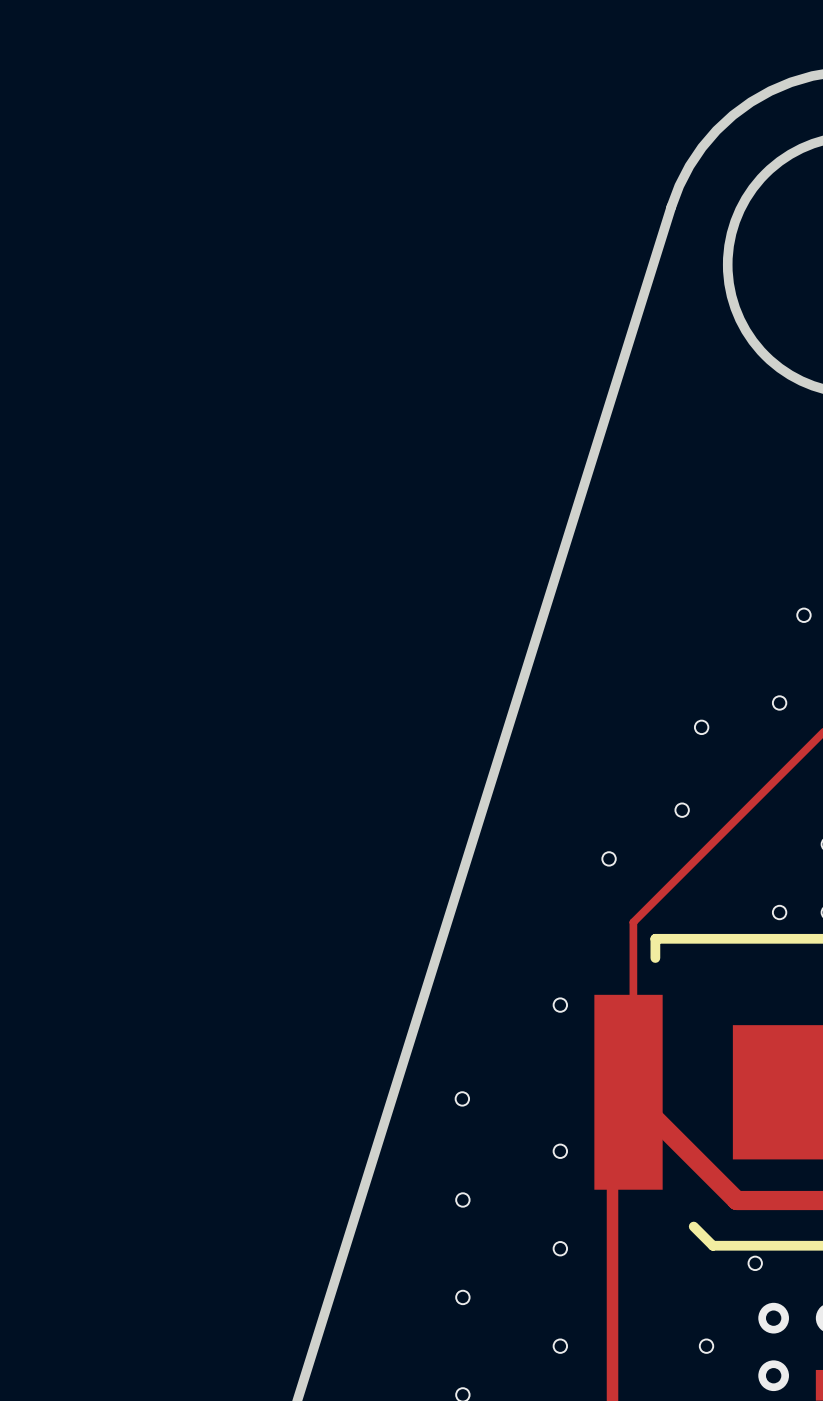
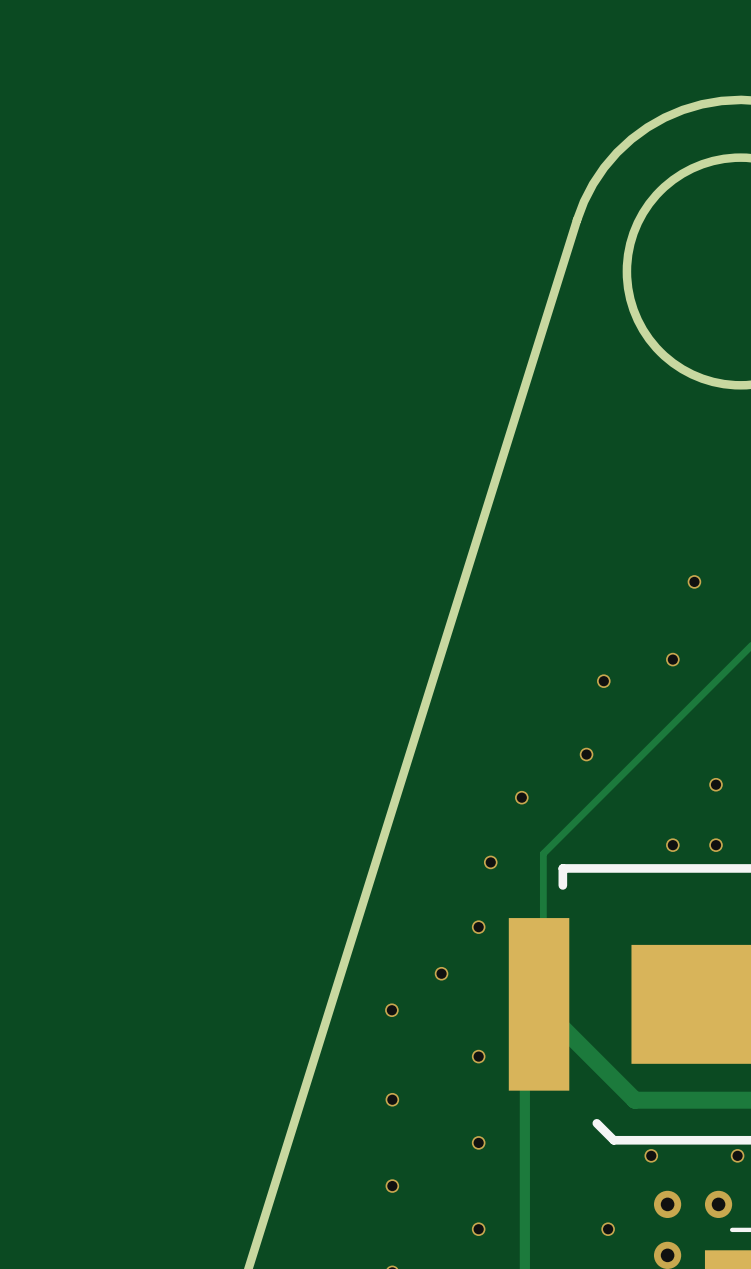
via: none -> (490, 862)
via: none -> (441, 973)

